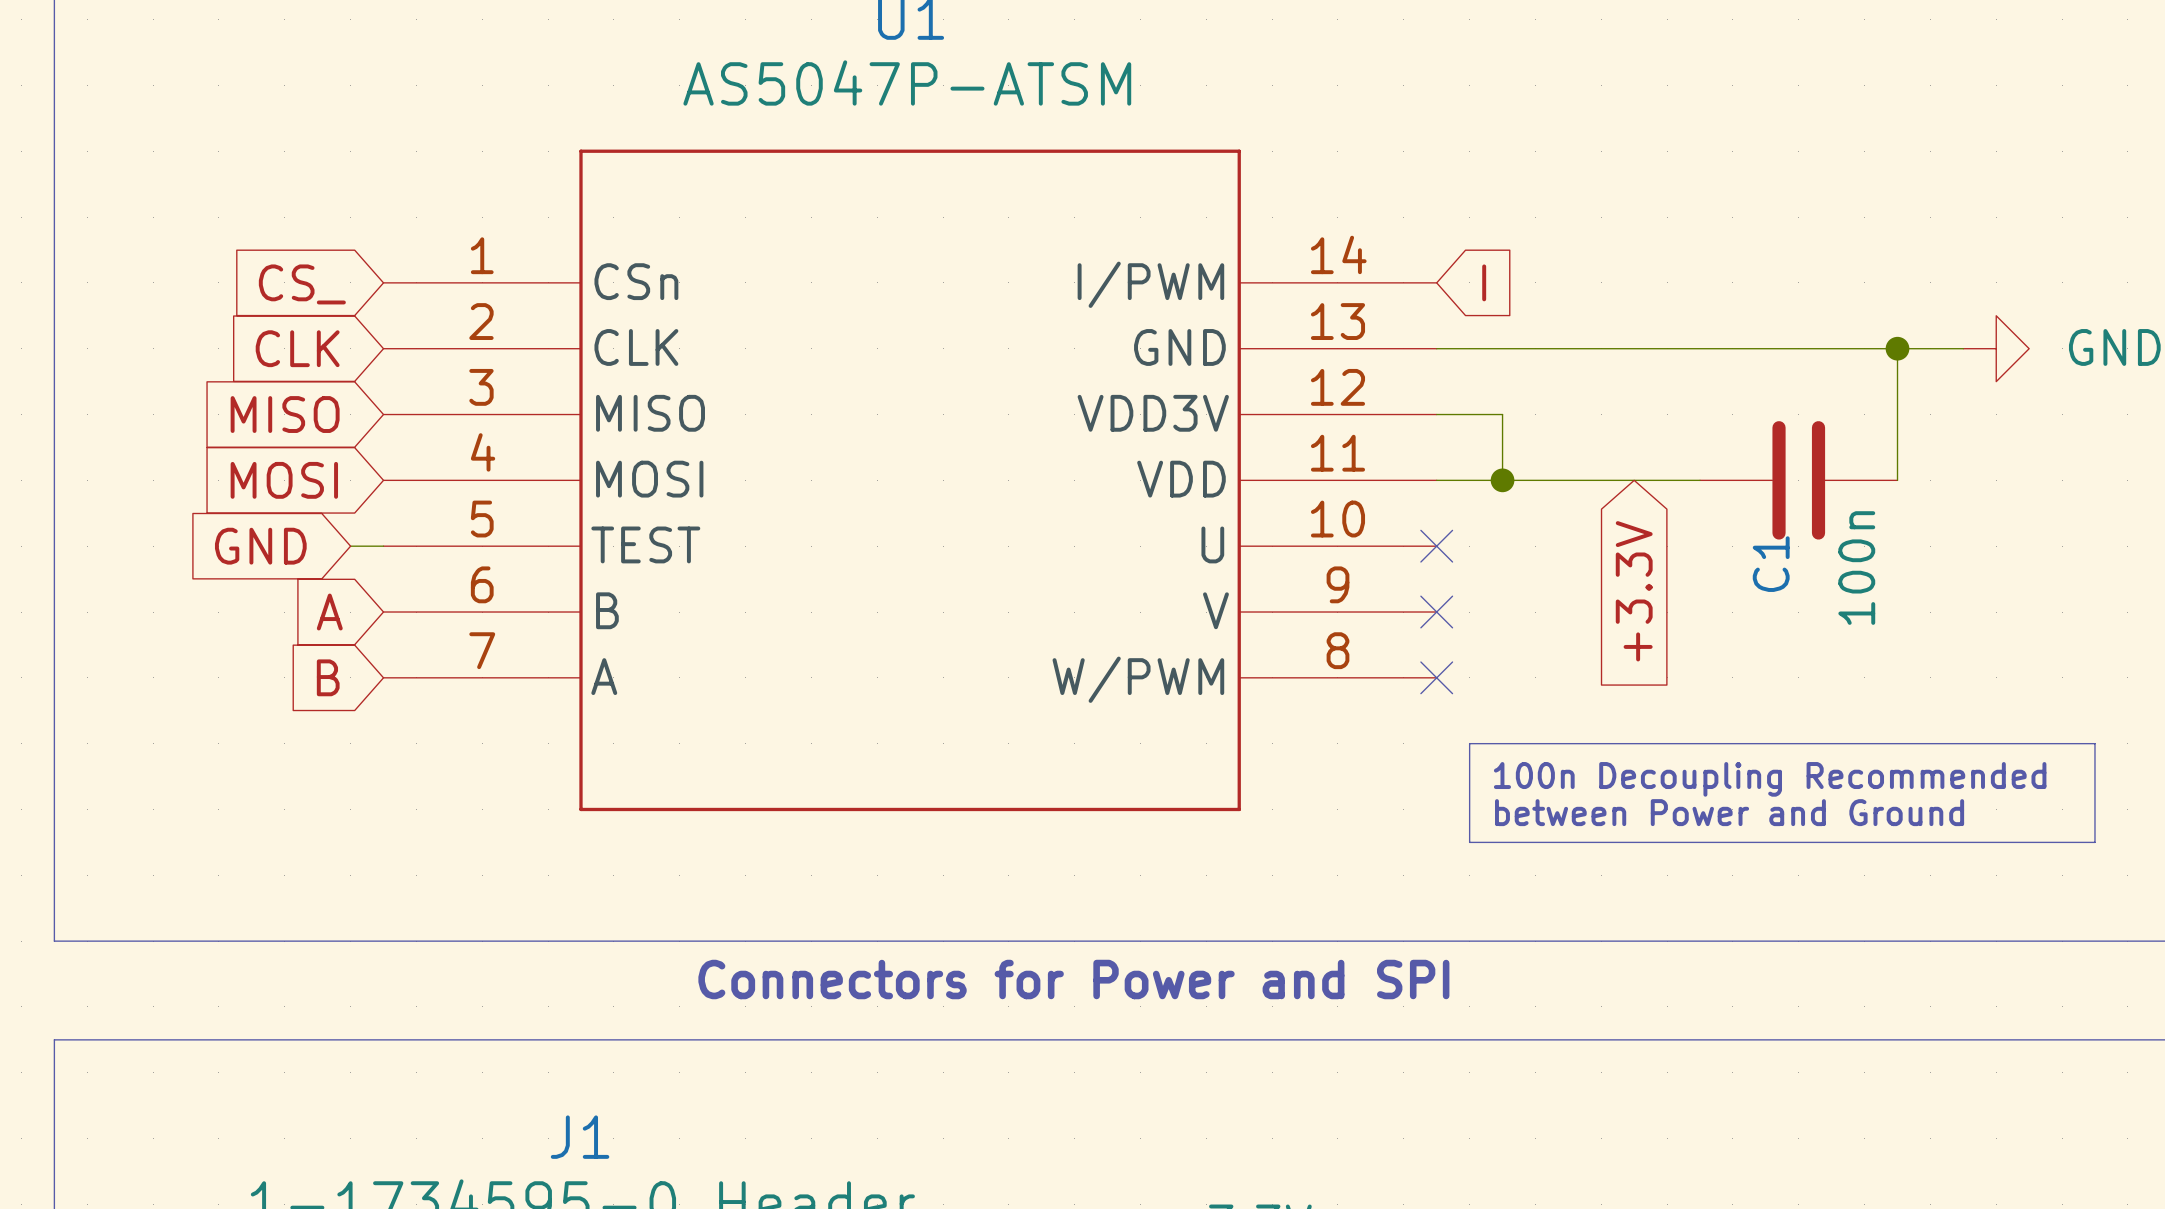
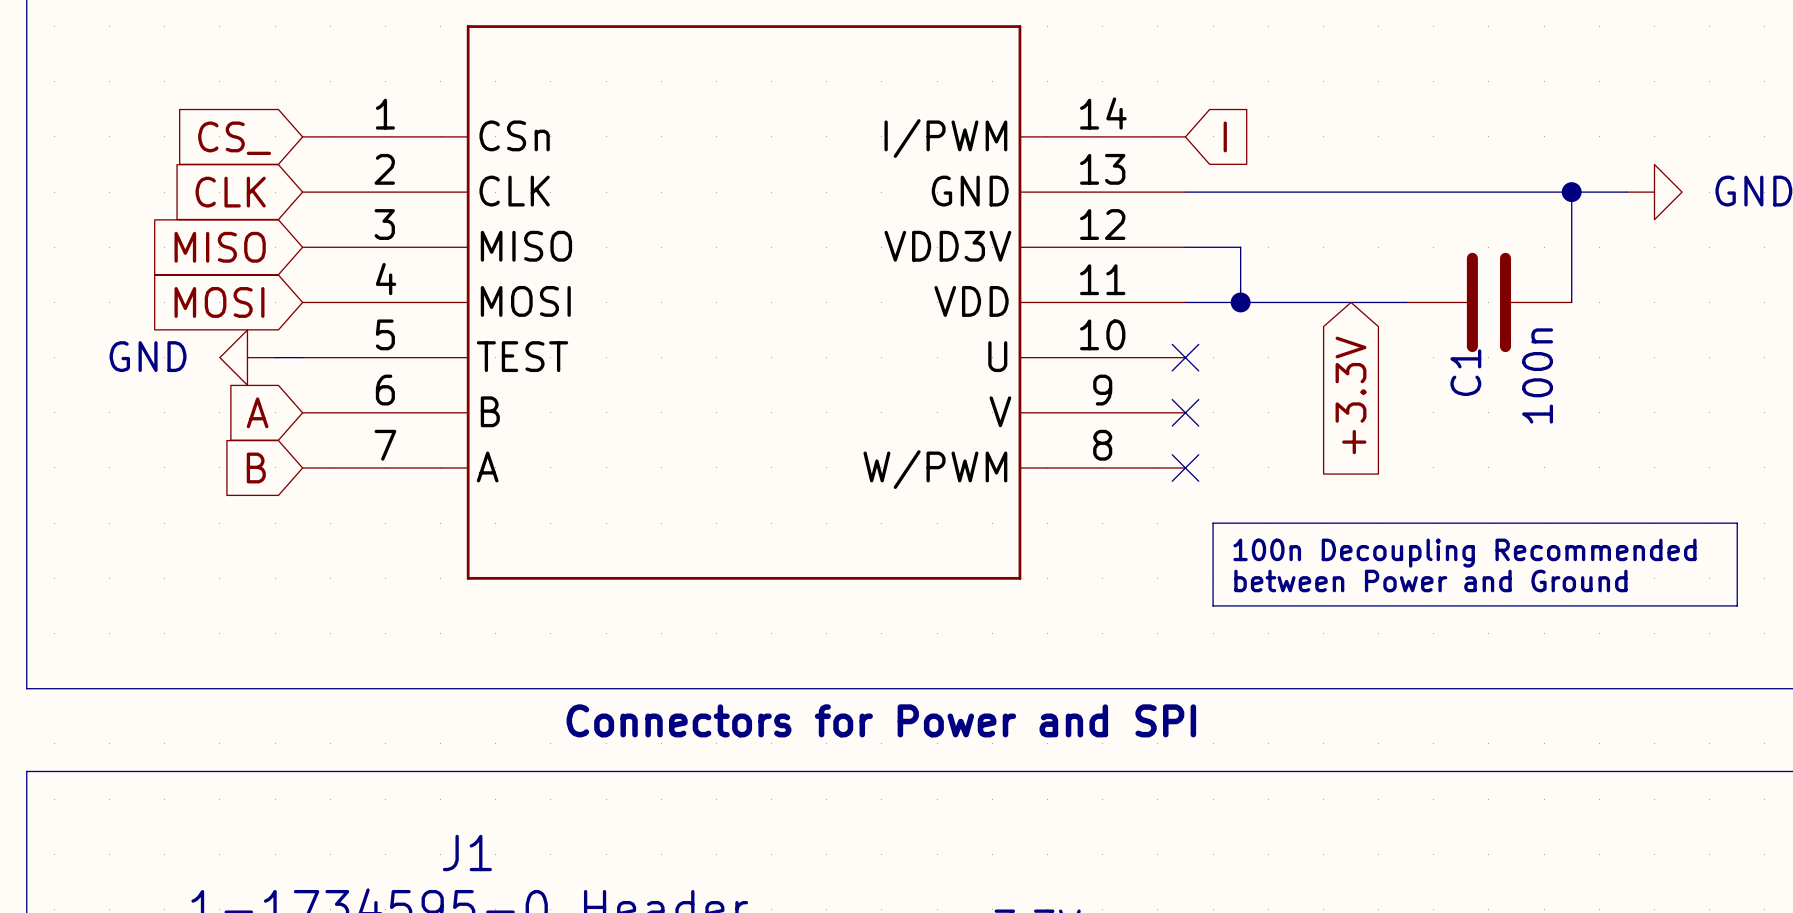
global label: GND (260, 546) -> none
power symbol: none -> GND (247, 357)

